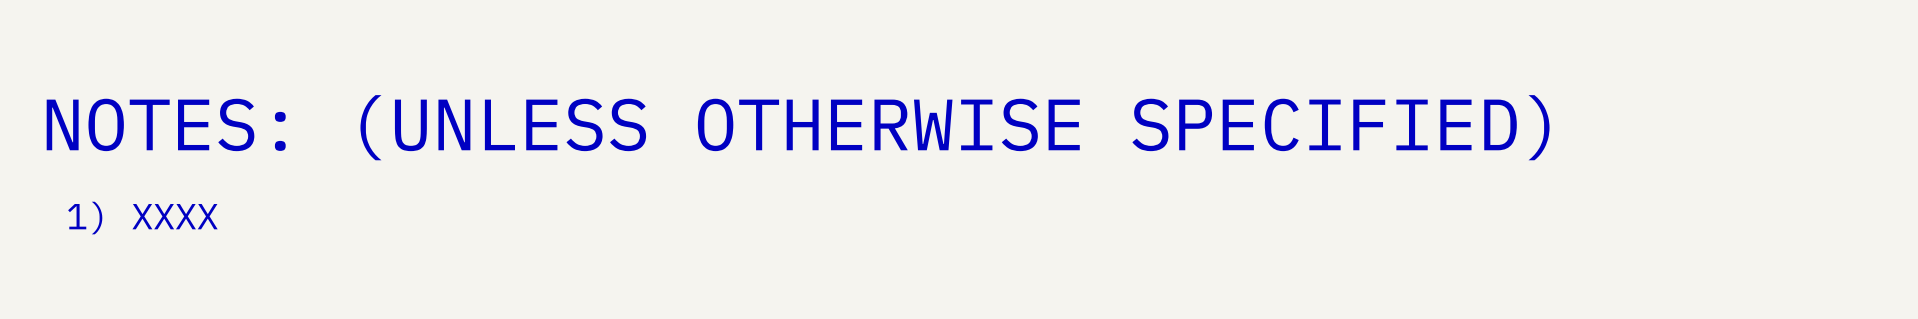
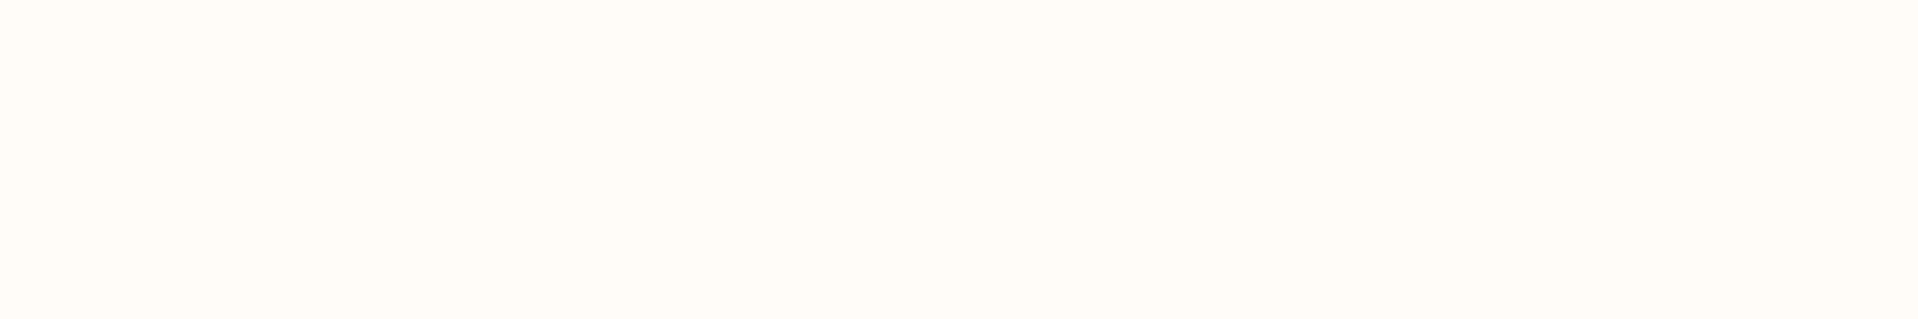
text: NOTES: (UNLESS OTHERWISE SPECIFIED) (798, 127) -> none
text: 1) XXXX (142, 218) -> none

